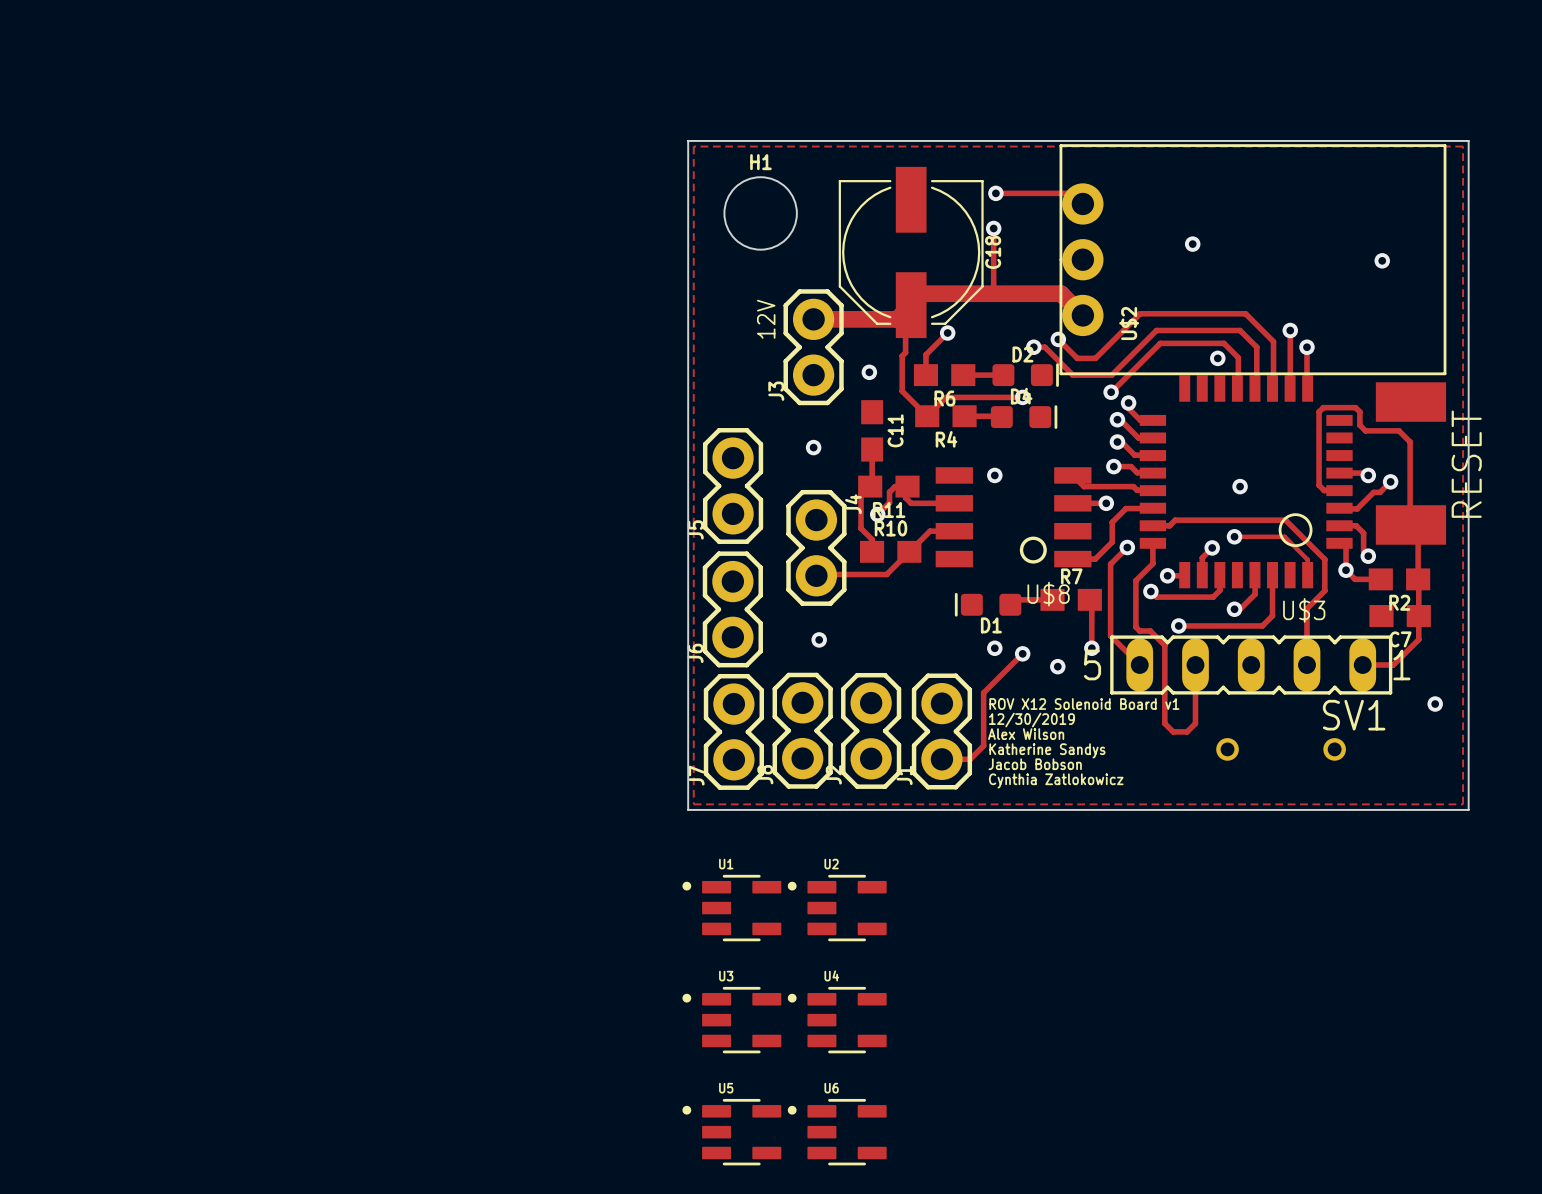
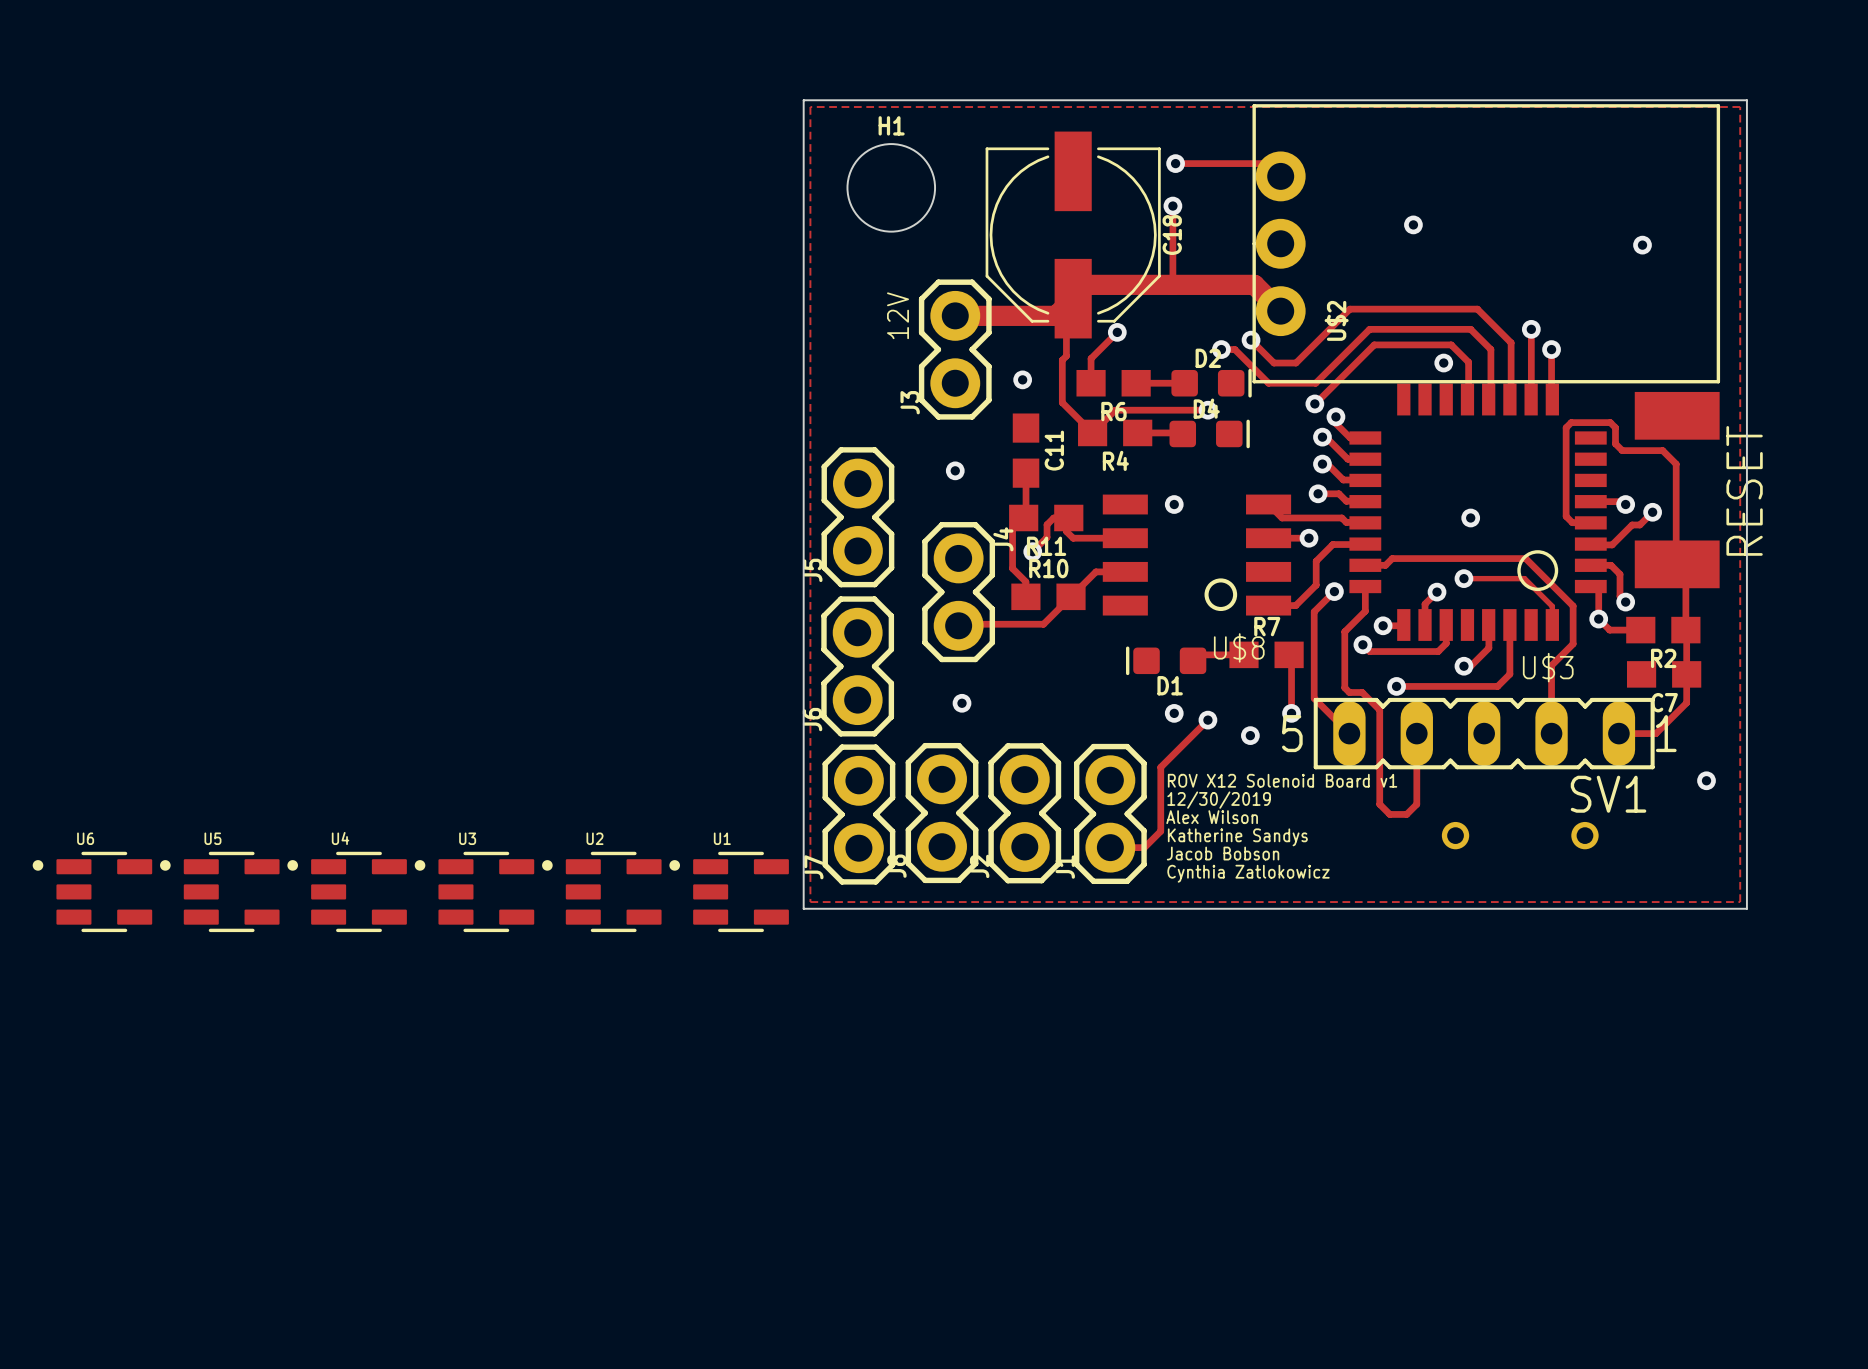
U1 position: (731, 908) -> (729, 891)
U2 position: (837, 908) -> (601, 891)
U3 position: (731, 1020) -> (474, 891)
U4 position: (837, 1020) -> (347, 891)
U5 position: (731, 1132) -> (219, 891)
U6 position: (837, 1132) -> (92, 891)

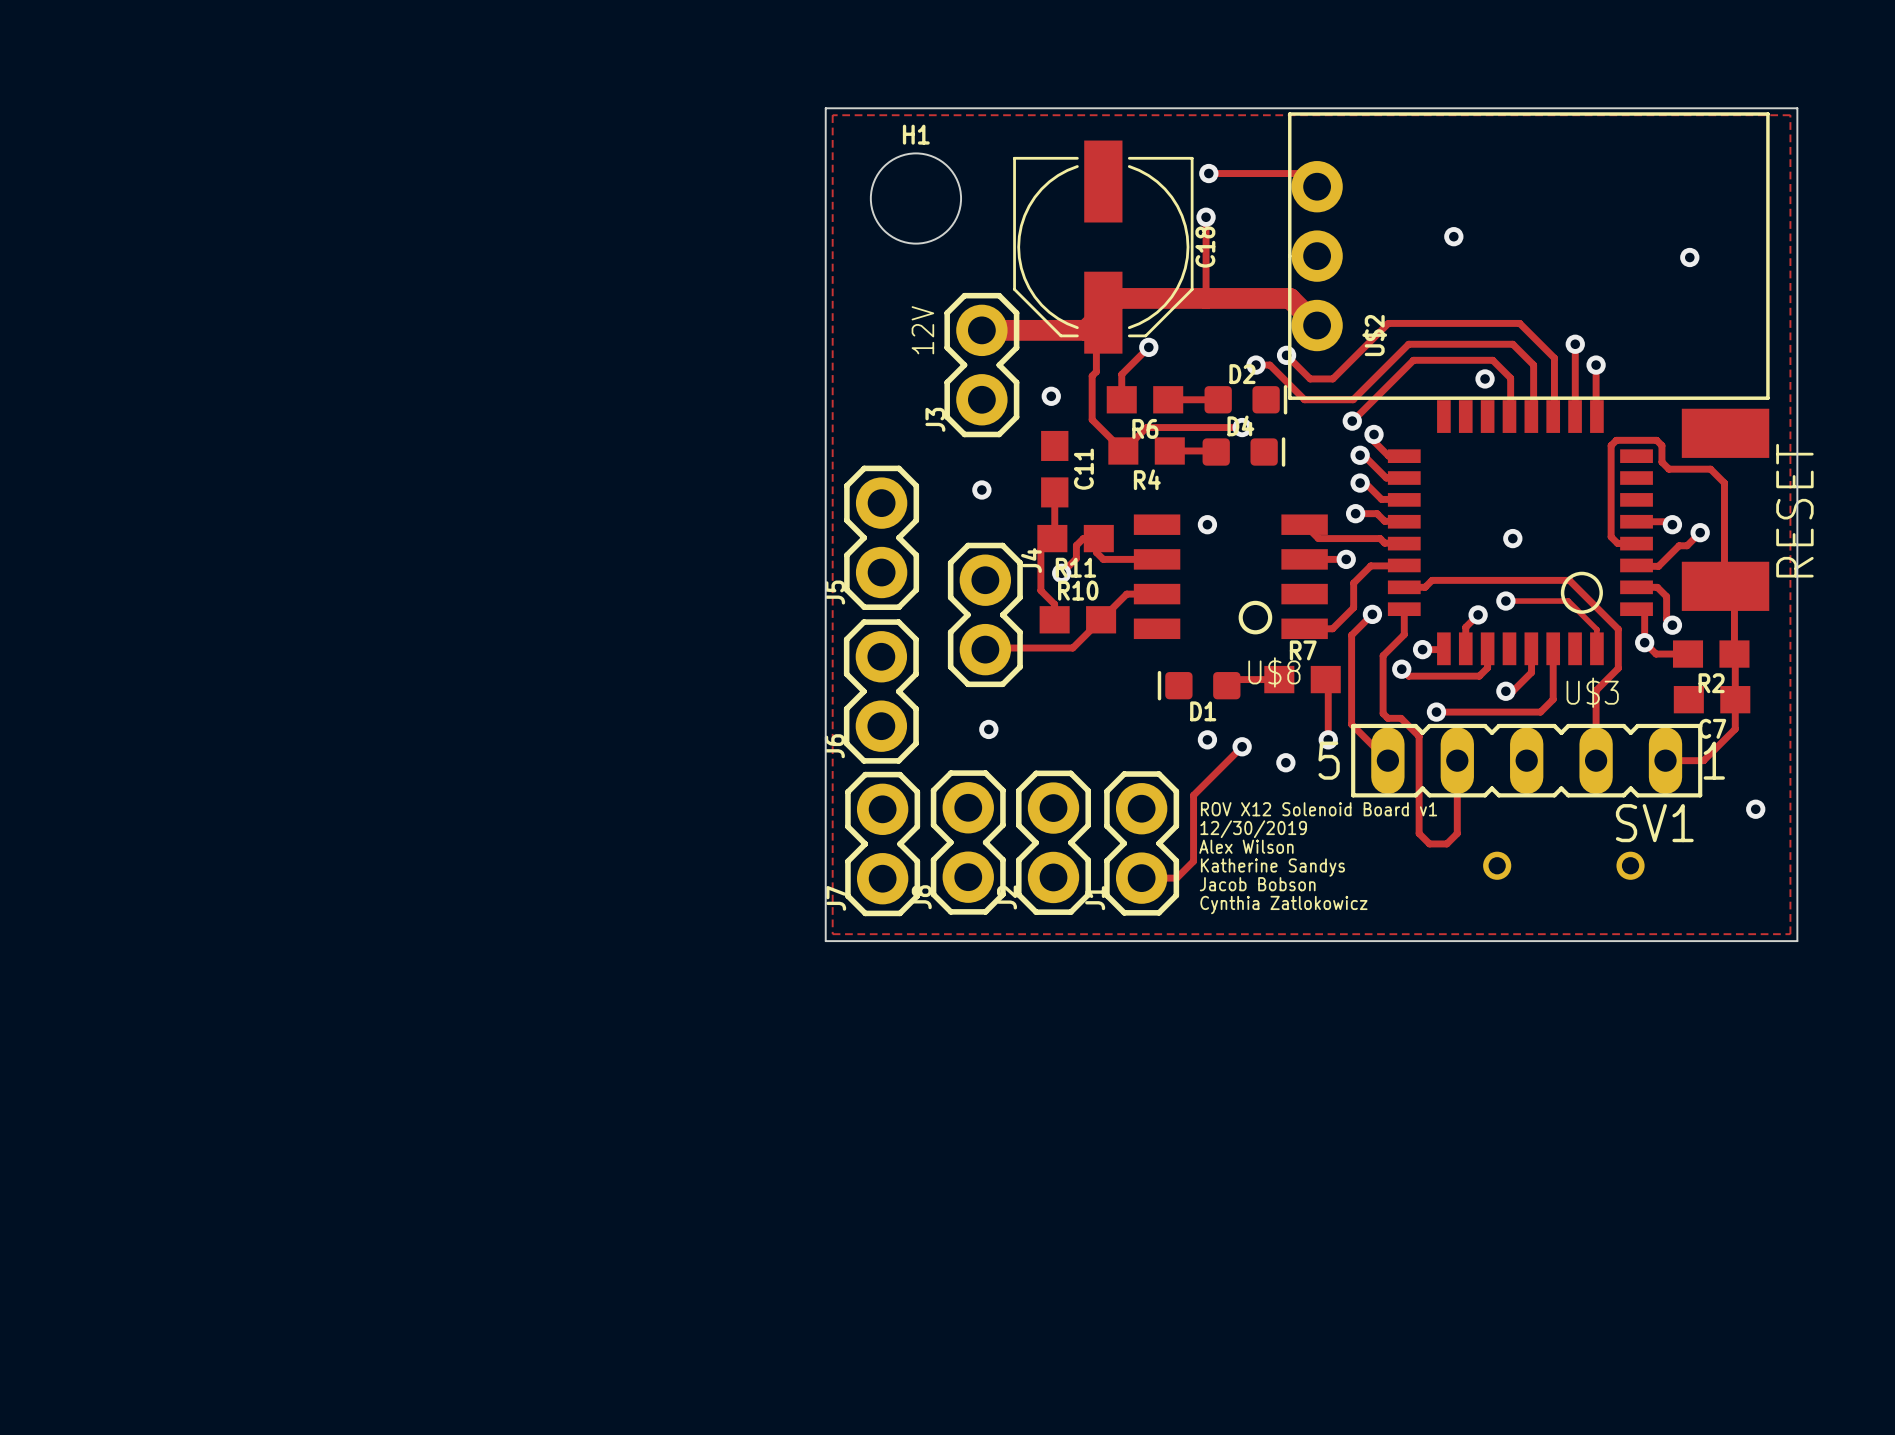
U6: (92, 891) -> none
U5: (219, 891) -> none
U4: (347, 891) -> none
U3: (474, 891) -> none
U2: (601, 891) -> none
U1: (729, 891) -> none

